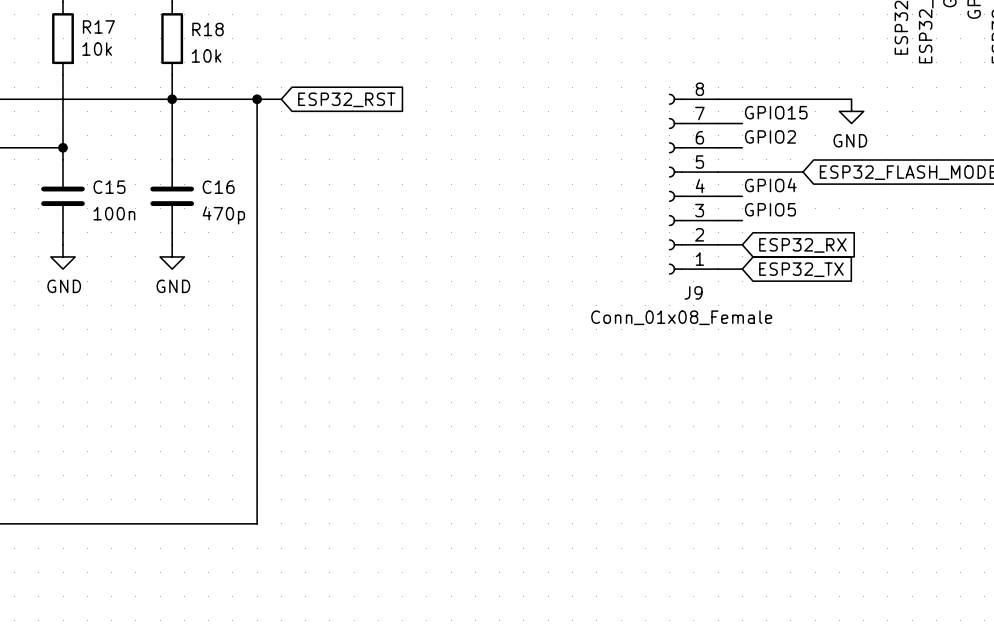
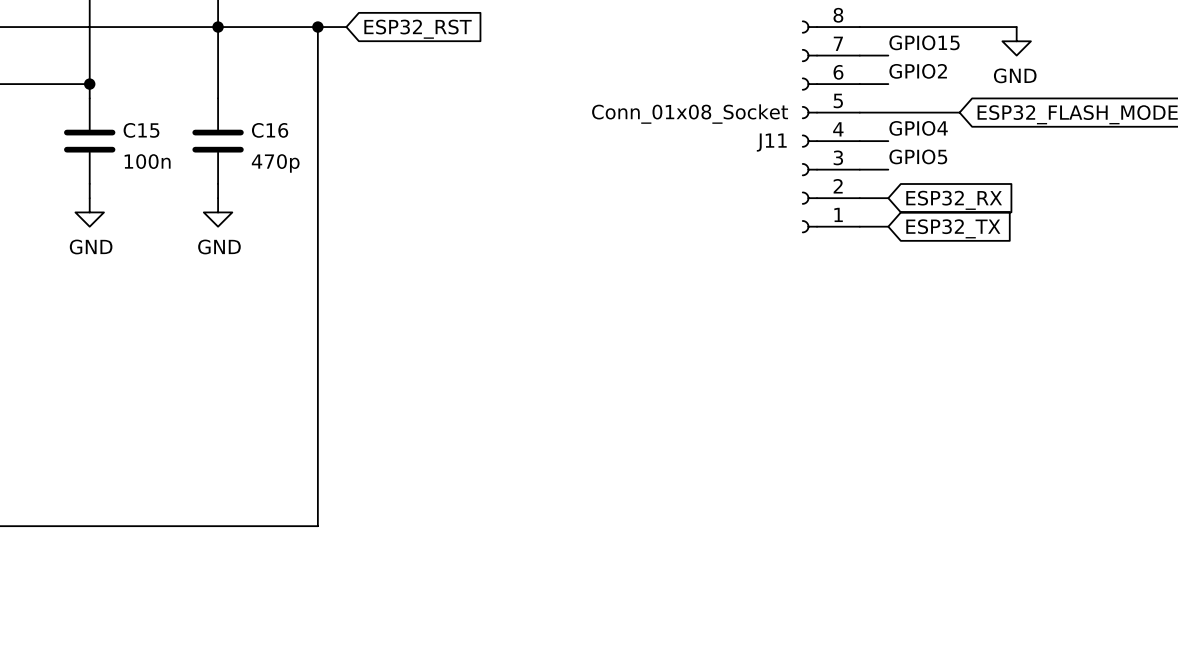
J9 name: J9 (693, 292) -> J11 (771, 142)
J9 value: Conn_01x08_Female (681, 317) -> Conn_01x08_Socket (690, 114)

